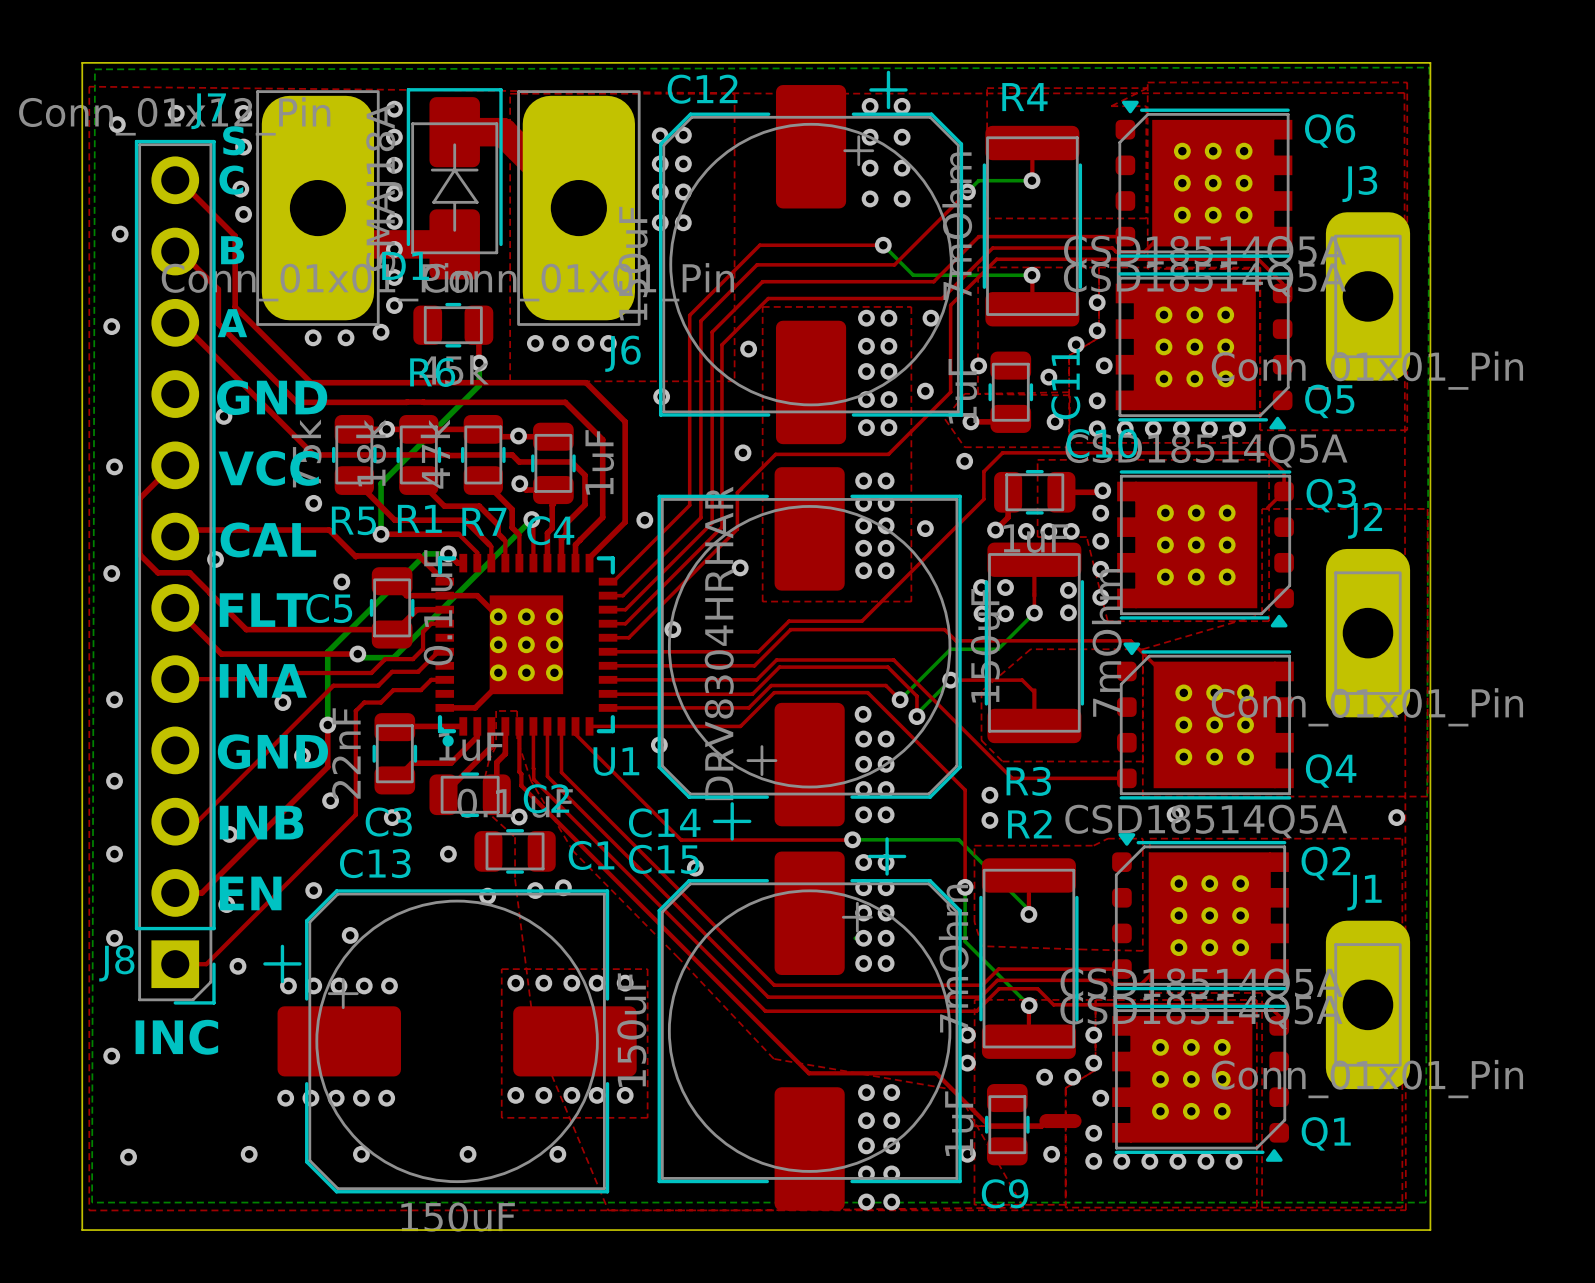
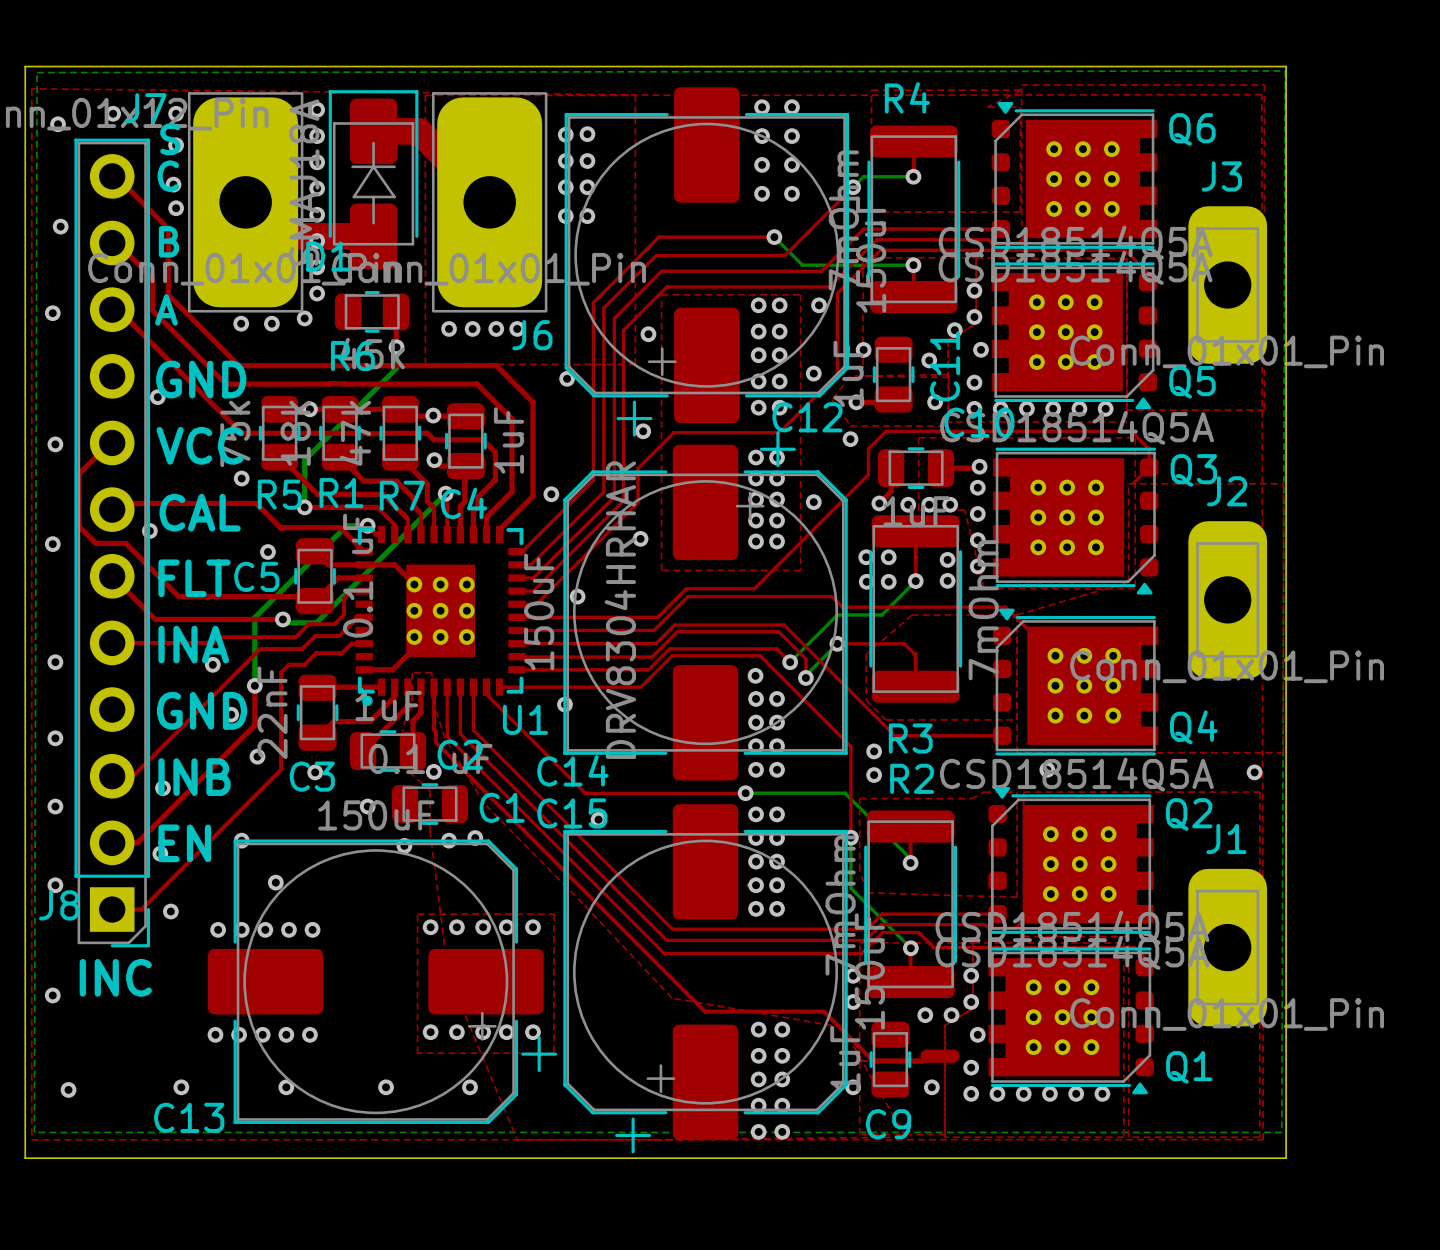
C12 rotation: 0° (811, 257) -> 180° (706, 261)
C14 rotation: 0° (809, 653) -> 180° (705, 605)
C13 name position: C13 (375, 863) -> C13 (189, 1117)
C15 rotation: 0° (809, 1023) -> 180° (705, 978)
C13 rotation: 0° (449, 1041) -> 180° (382, 981)

